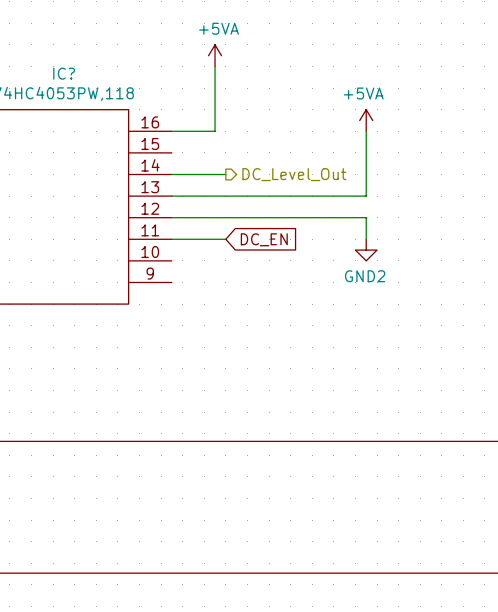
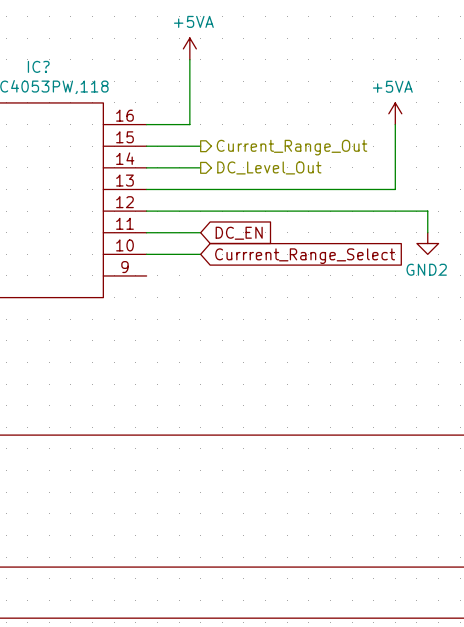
power symbol position: +5VA (366, 120) -> +5VA (395, 113)
wire: (366, 131) (366, 196) -> (395, 124) (395, 189) (341, 189)
wire: none -> (146, 146) (200, 146)
hierarchical label: none -> Current_Range_Out (291, 147)
wire: (366, 217) (366, 239) -> (341, 211) (427, 211) (427, 232)
power symbol position: GND2 (366, 250) -> GND2 (427, 243)
wire: none -> (146, 254) (200, 254)
global label: none -> Currrent_Range_Select (305, 256)

